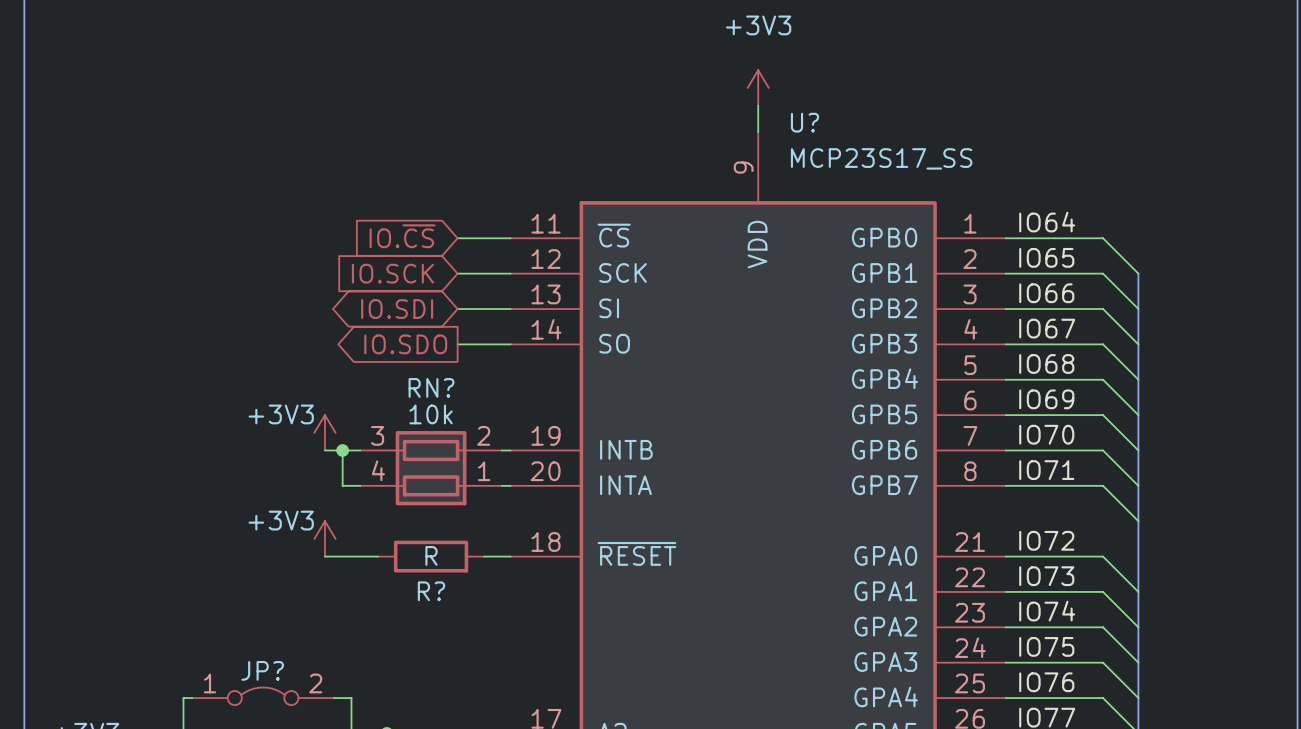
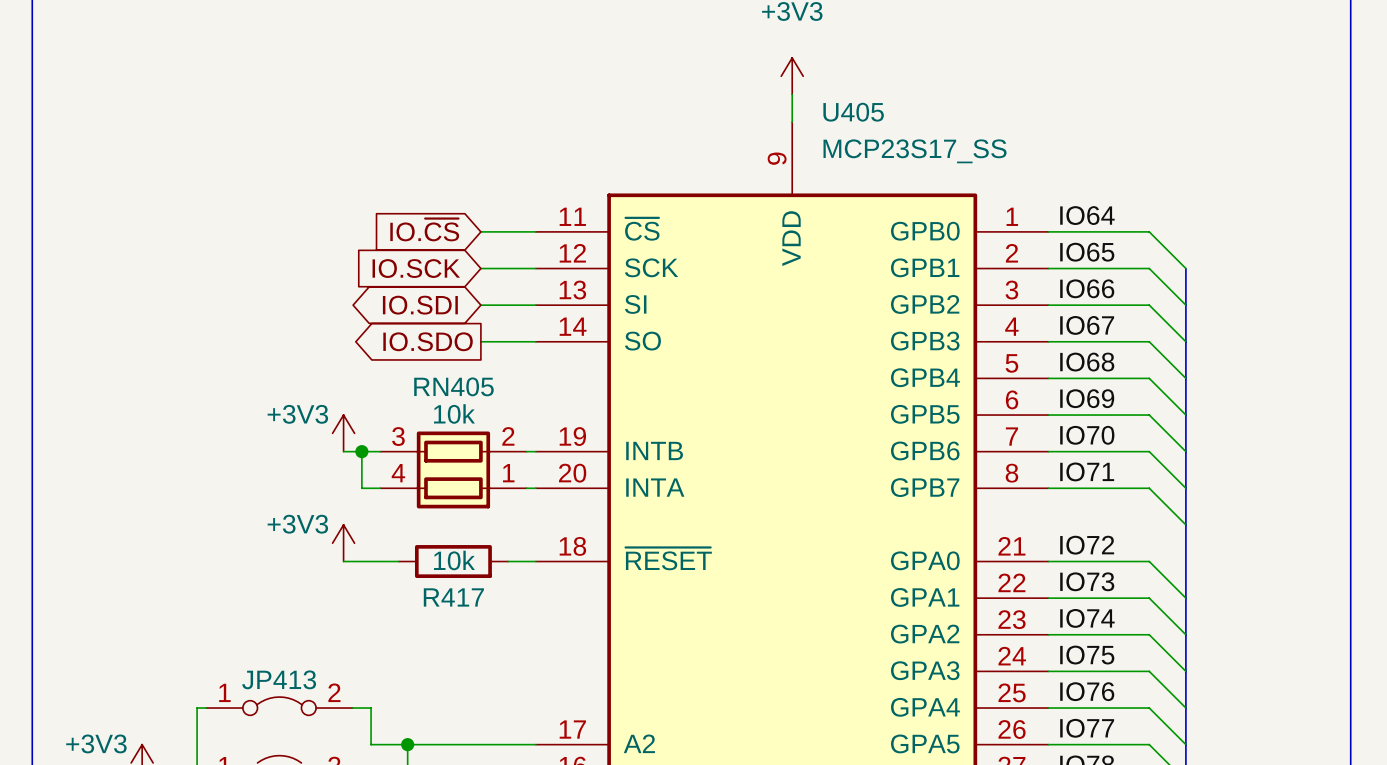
U? name: U? (804, 122) -> U405 (853, 112)
RN? name: RN? (431, 387) -> RN405 (453, 386)
R? value: R (431, 555) -> 10k (454, 560)
R? name: R? (431, 591) -> R417 (453, 597)
JP? name: JP? (262, 670) -> JP413 (279, 679)

